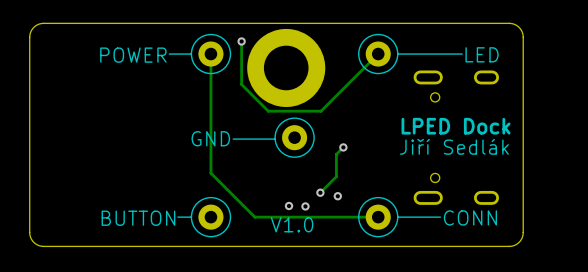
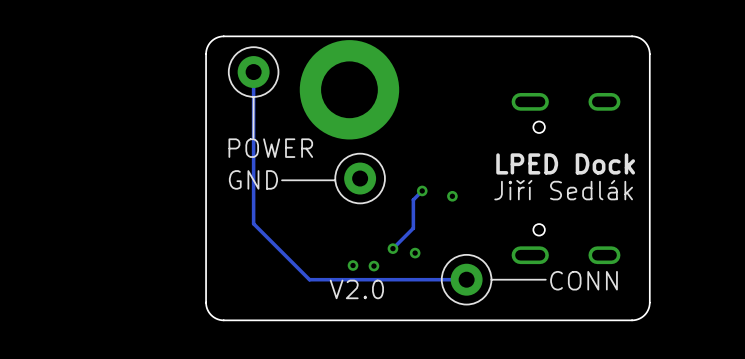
board edge: (509, 23) (37, 24) (31, 29) (29, 37) (31, 238) (36, 244) (43, 246) (515, 245) (521, 239) (523, 232) (523, 37) (519, 27) (509, 23) -> (632, 36) (644, 41) (649, 54) (649, 302) (647, 312) (641, 317) (632, 320) (223, 320) (214, 317) (208, 312) (206, 302) (206, 54) (207, 46) (214, 39) (223, 36) (632, 36)
drawing: [358, 33, 399, 75] -> none
track: (241, 41) (241, 84) (268, 111) (321, 111) (378, 54) -> none
via: (241, 41) -> none
line: (191, 54) (169, 54) -> none
part: (378, 54) -> none
line: (462, 54) (397, 54) -> none
text: LED (482, 54) -> none
text position: POWER (133, 55) -> POWER (270, 148)
line: none -> (253, 96) (253, 137)
via: none -> (452, 196)
drawing: [190, 196, 232, 238] -> none
line: (191, 217) (177, 217) -> none
part: (210, 217) -> none
text: BUTTON (138, 218) -> none
text: V1.0 (292, 224) -> V2.0 (356, 289)

